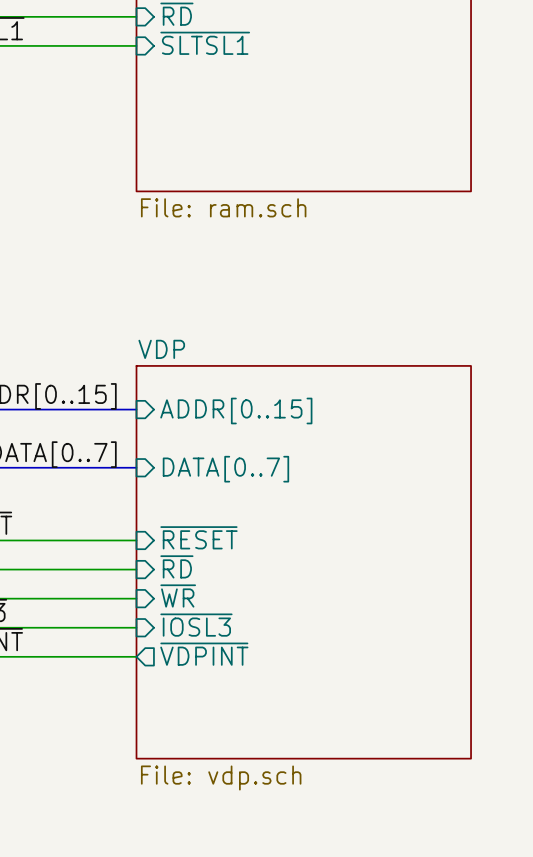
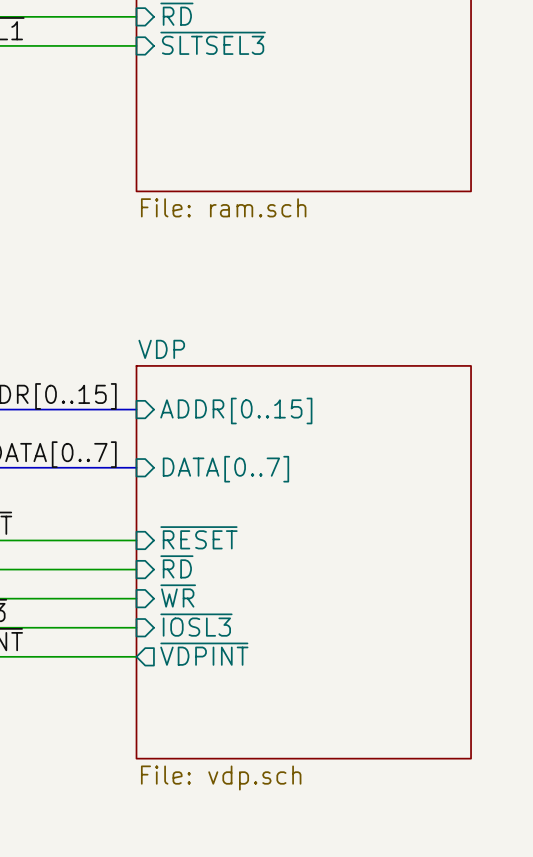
sheet pin: ~{SLTSL1} (205, 43) -> ~{SLTSEL3} (213, 43)

